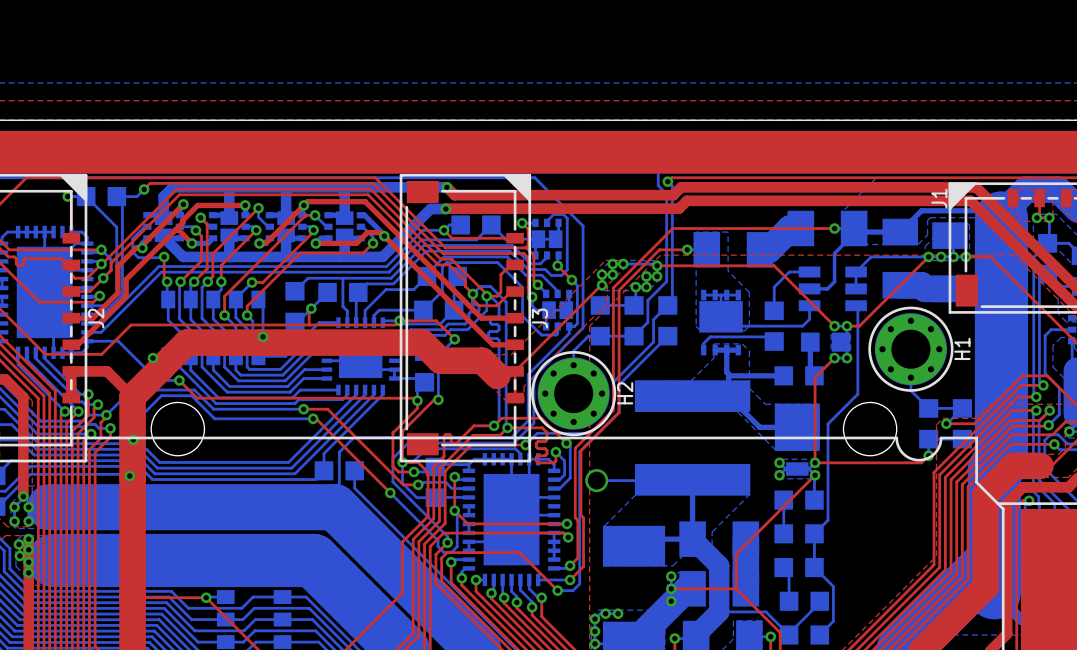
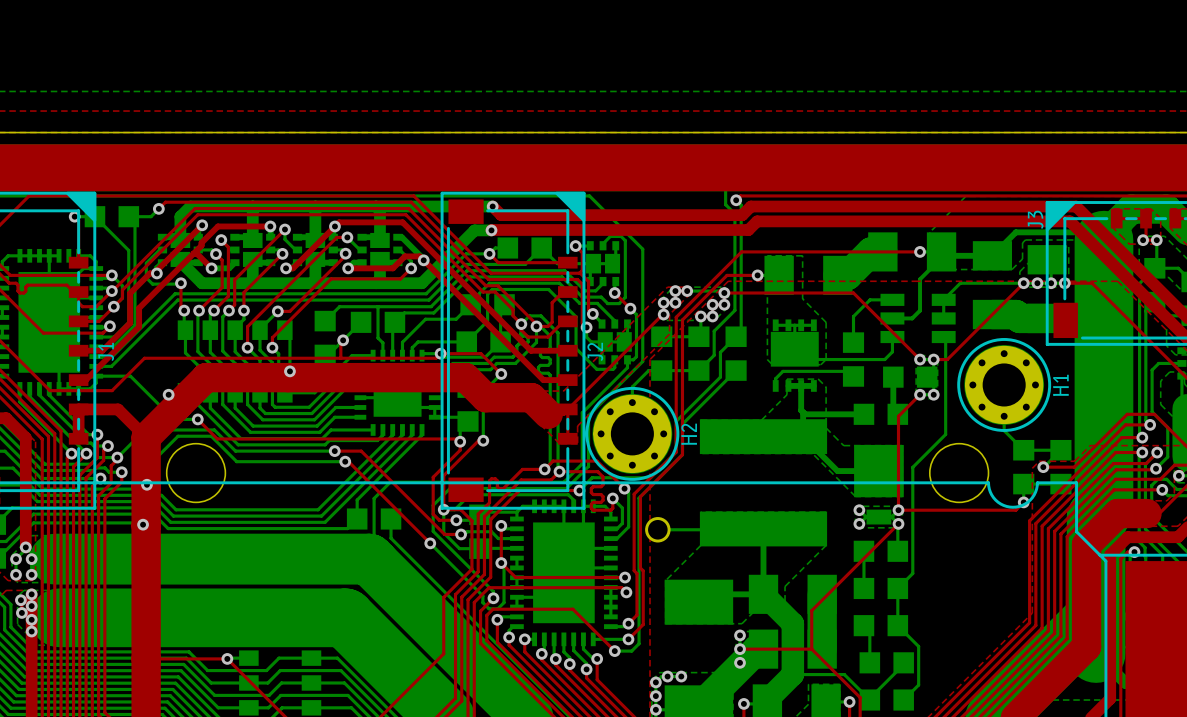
J1 name: J1 (939, 198) -> J3 (1035, 219)
J2 name: J2 (96, 318) -> J1 (106, 351)
J3 name: J3 (539, 318) -> J2 (595, 351)

